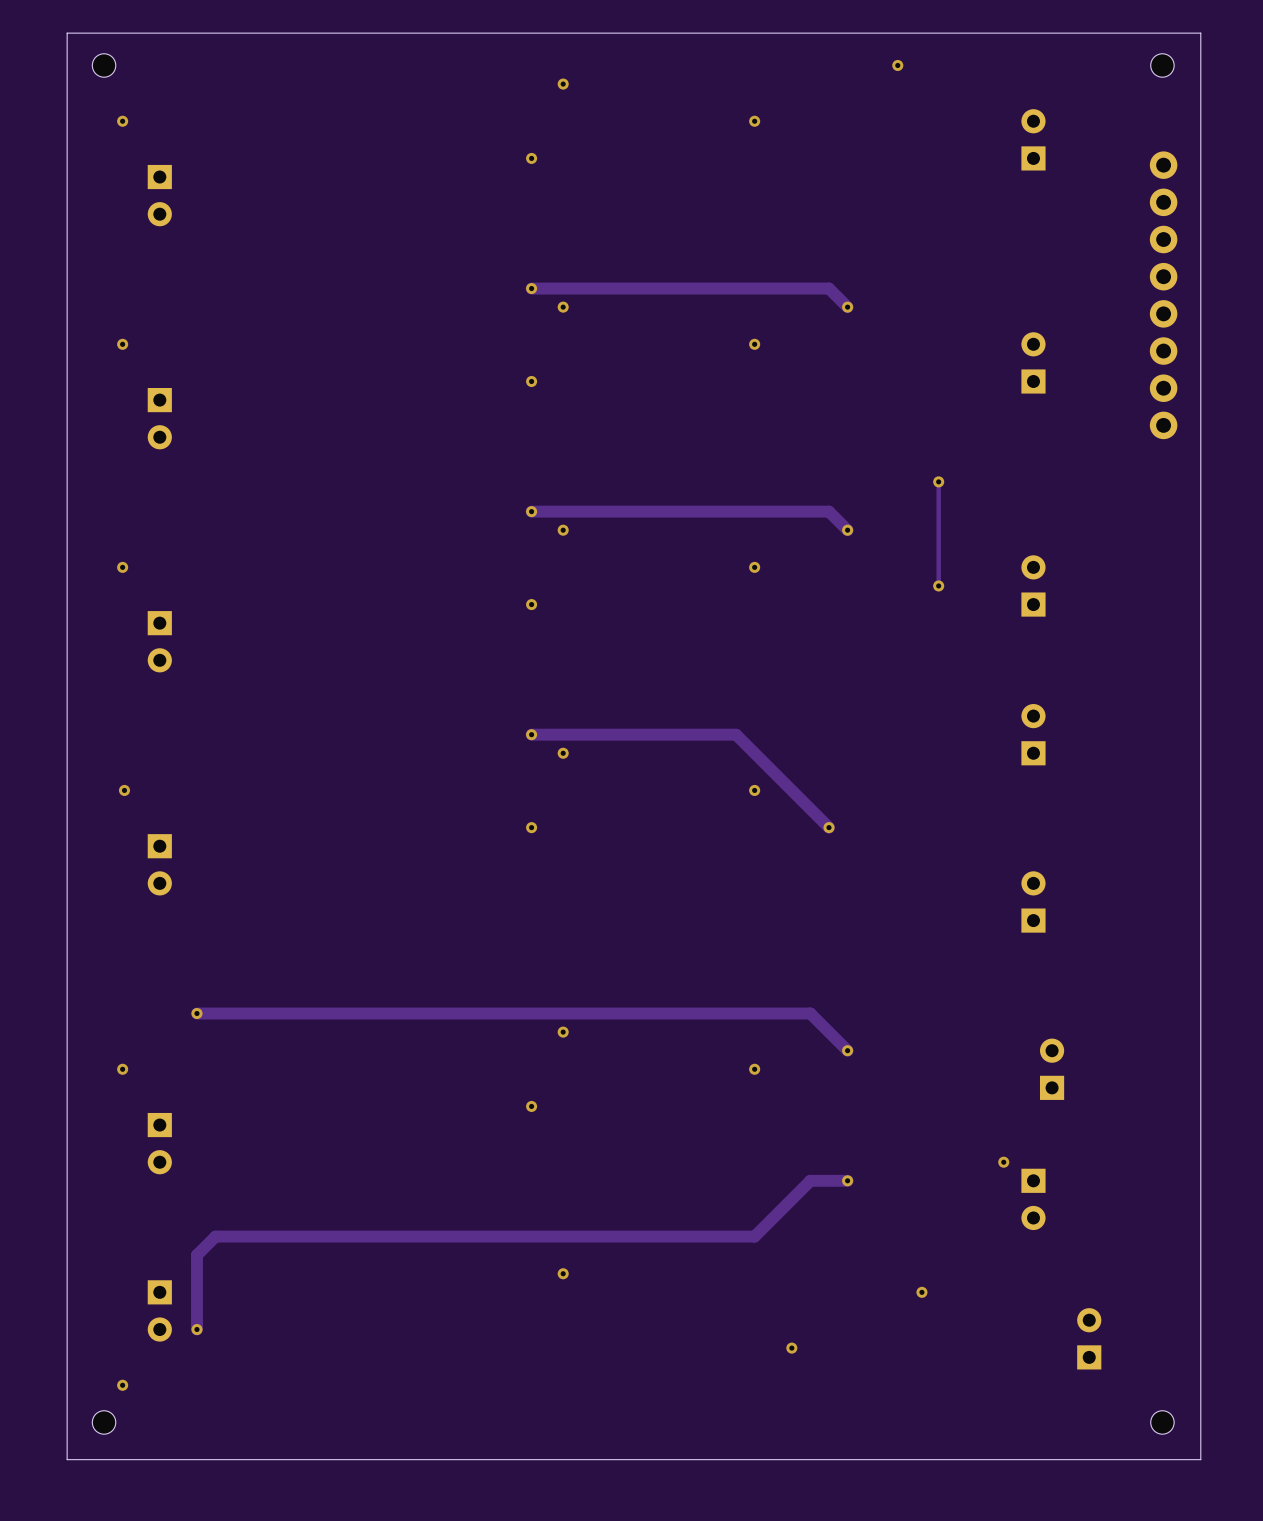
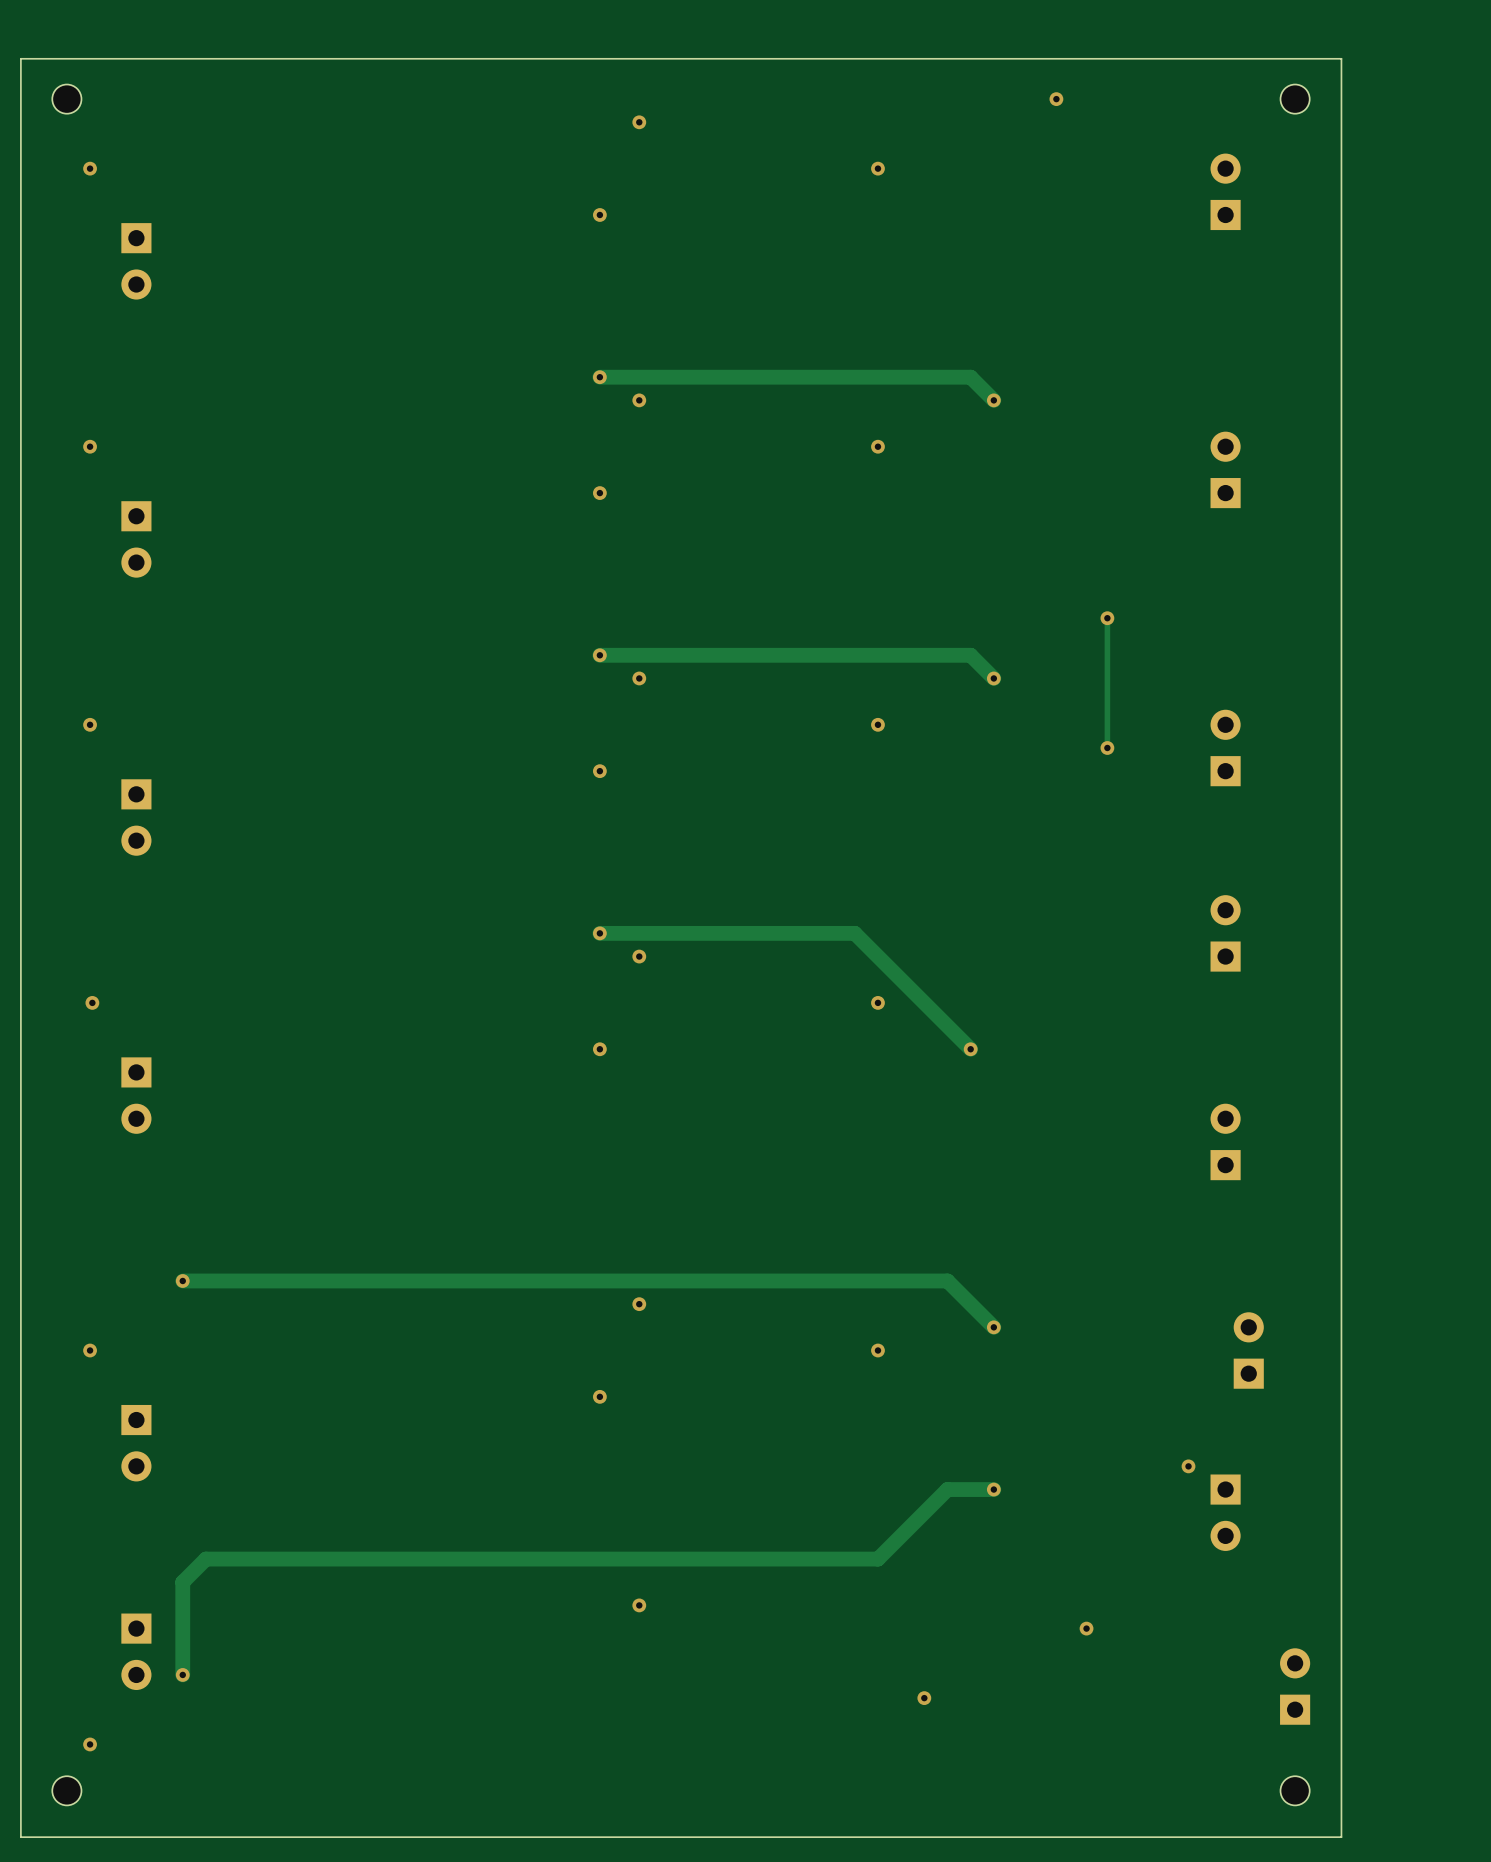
board edge: (1126, 33) (1200, 33) (1200, 1459) (1126, 1459) -> (1341, 58) (1341, 1837)
hole position: (1162, 65) -> (1295, 99)
part: (1163, 295) -> none
hole position: (1162, 1422) -> (1295, 1790)

